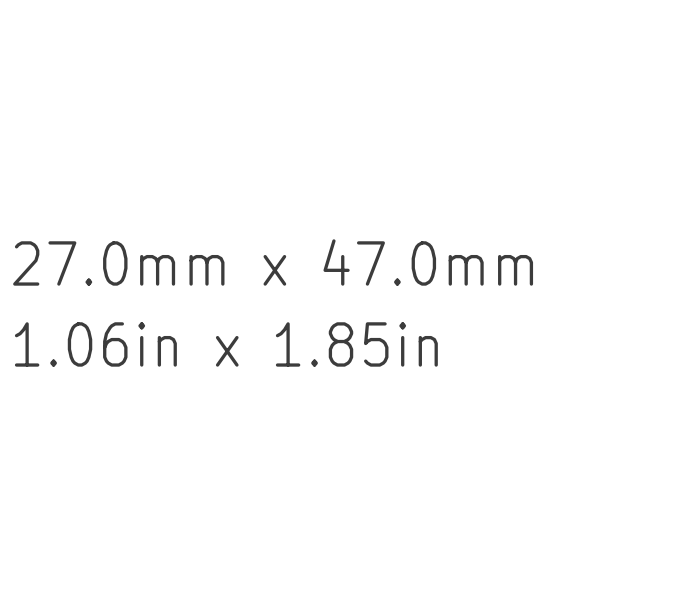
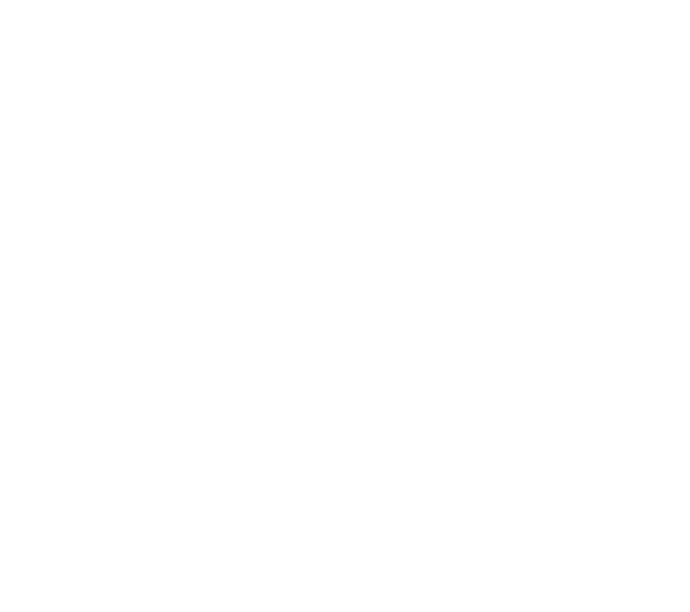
text: 27.0mm x 47.0mm (273, 262) -> none
text: 1.06in x 1.85in (226, 344) -> none

